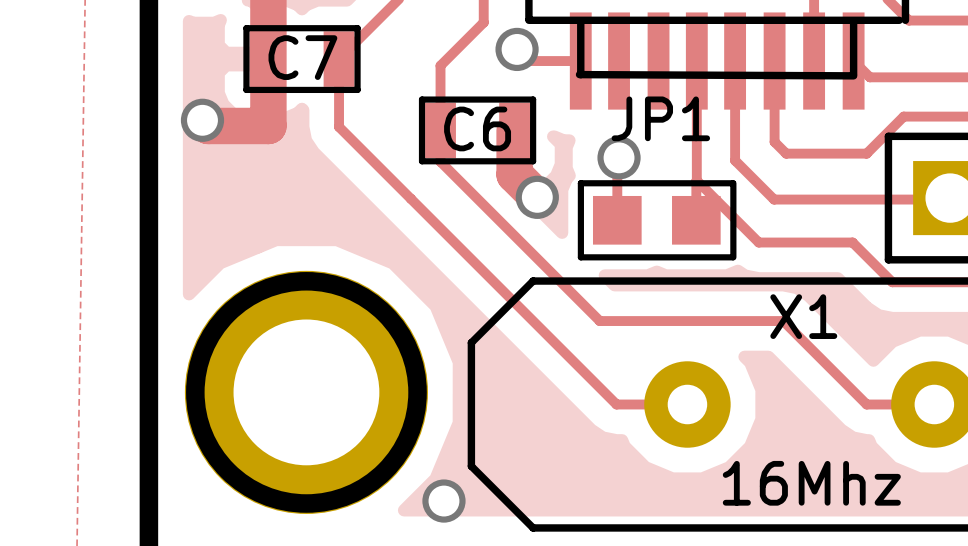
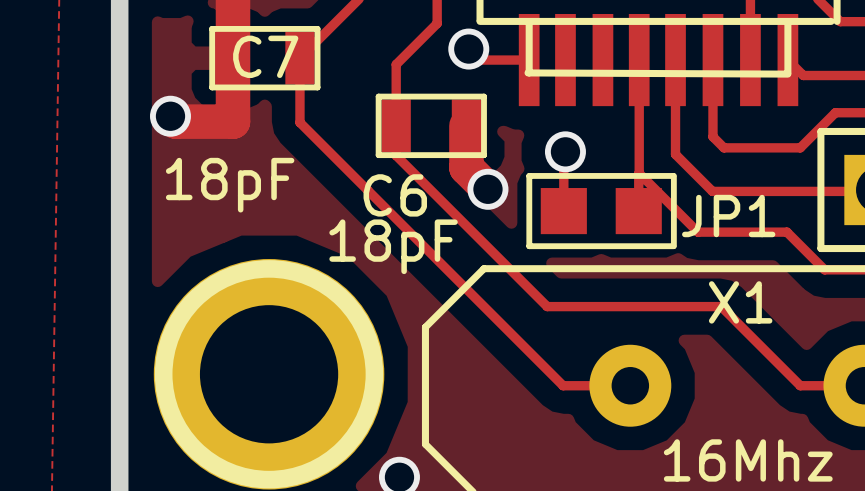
JP1 name position: JP1 (660, 118) -> JP1 (728, 216)
C6 name position: C6 (477, 128) -> C6 (395, 195)
C7 value: none -> 18pF (230, 185)
C6 value: none -> 18pF (393, 246)

